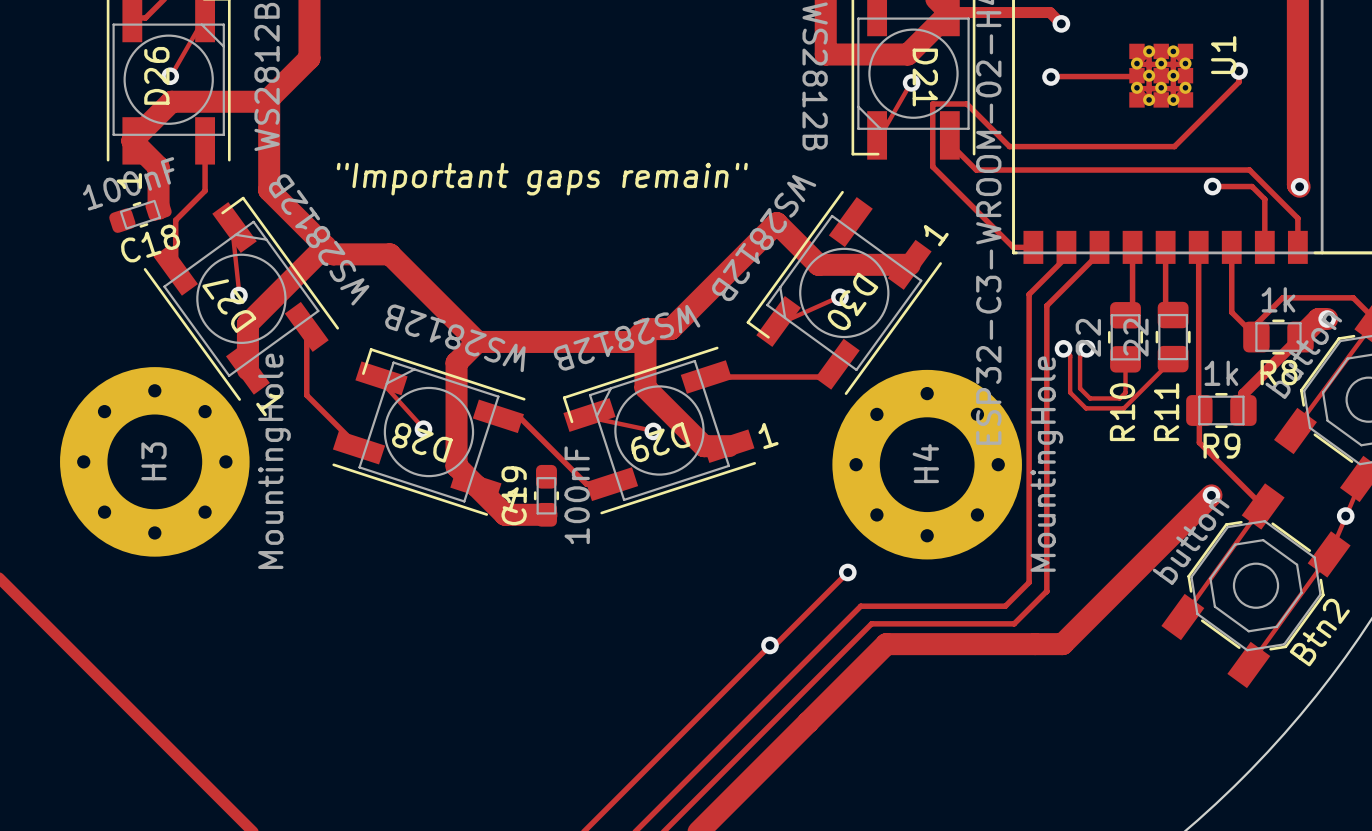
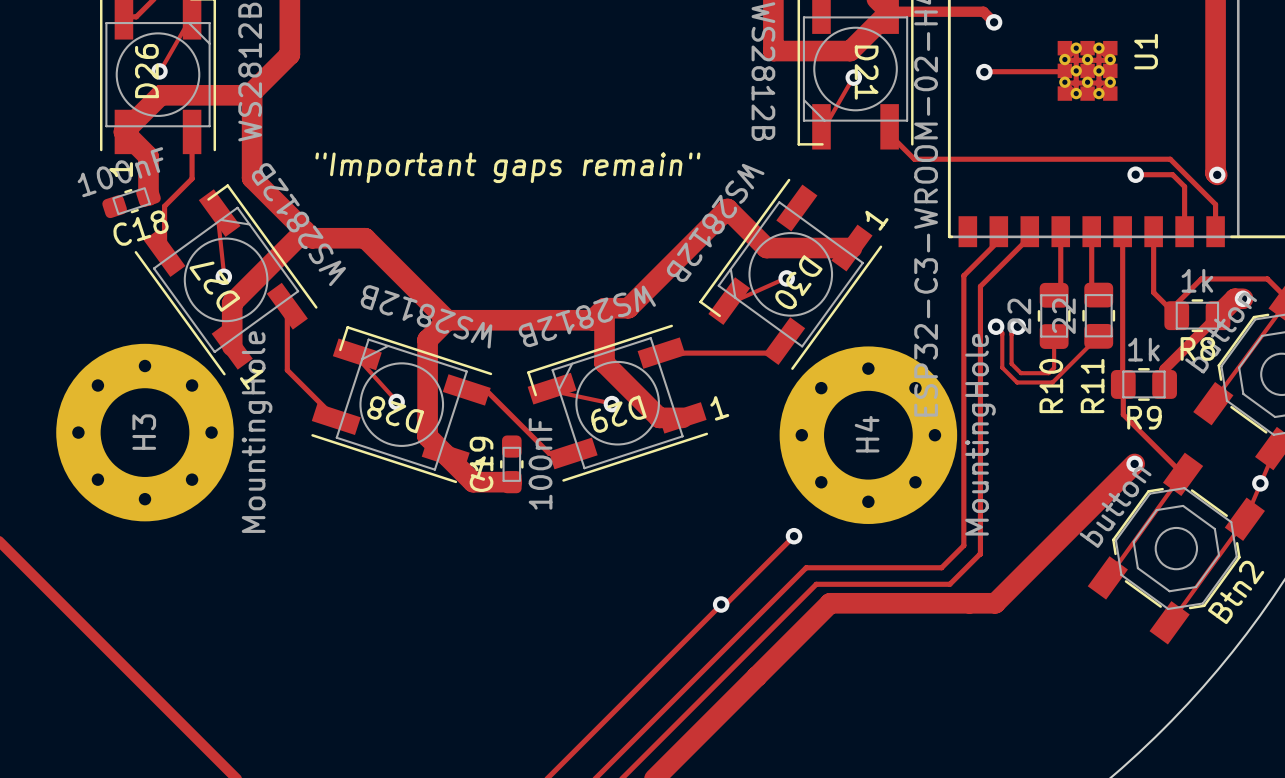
track: (1239, 71) (1239, 82) (1174, 146) (1009, 146) (966, 103) (932, 103) (932, 166) (1013, 247) (1033, 247) -> none
via: (1239, 71) -> none

